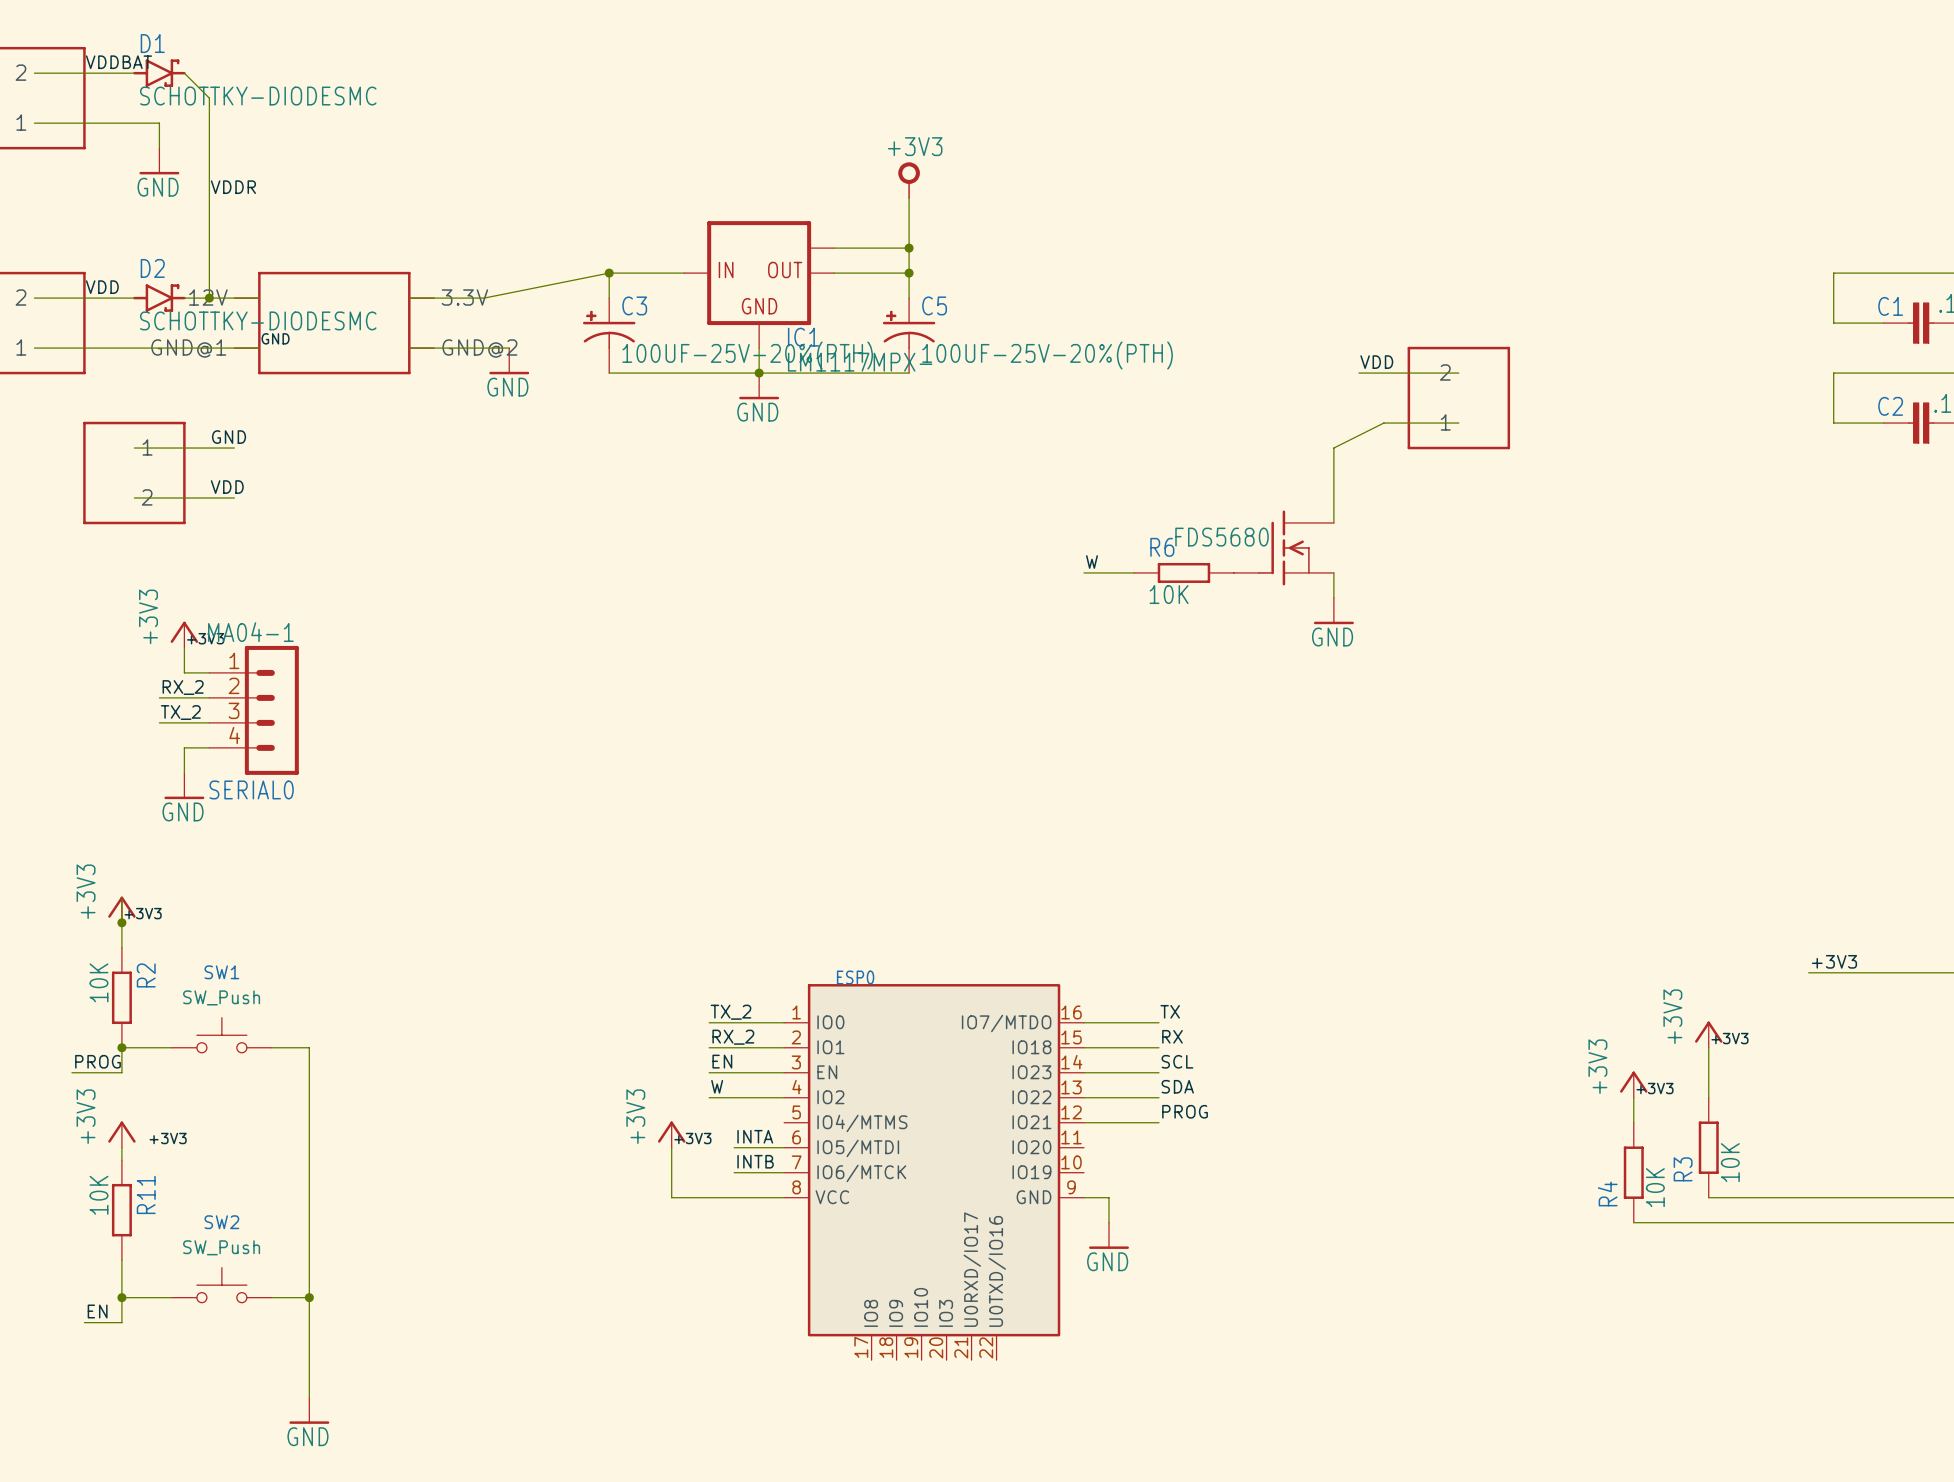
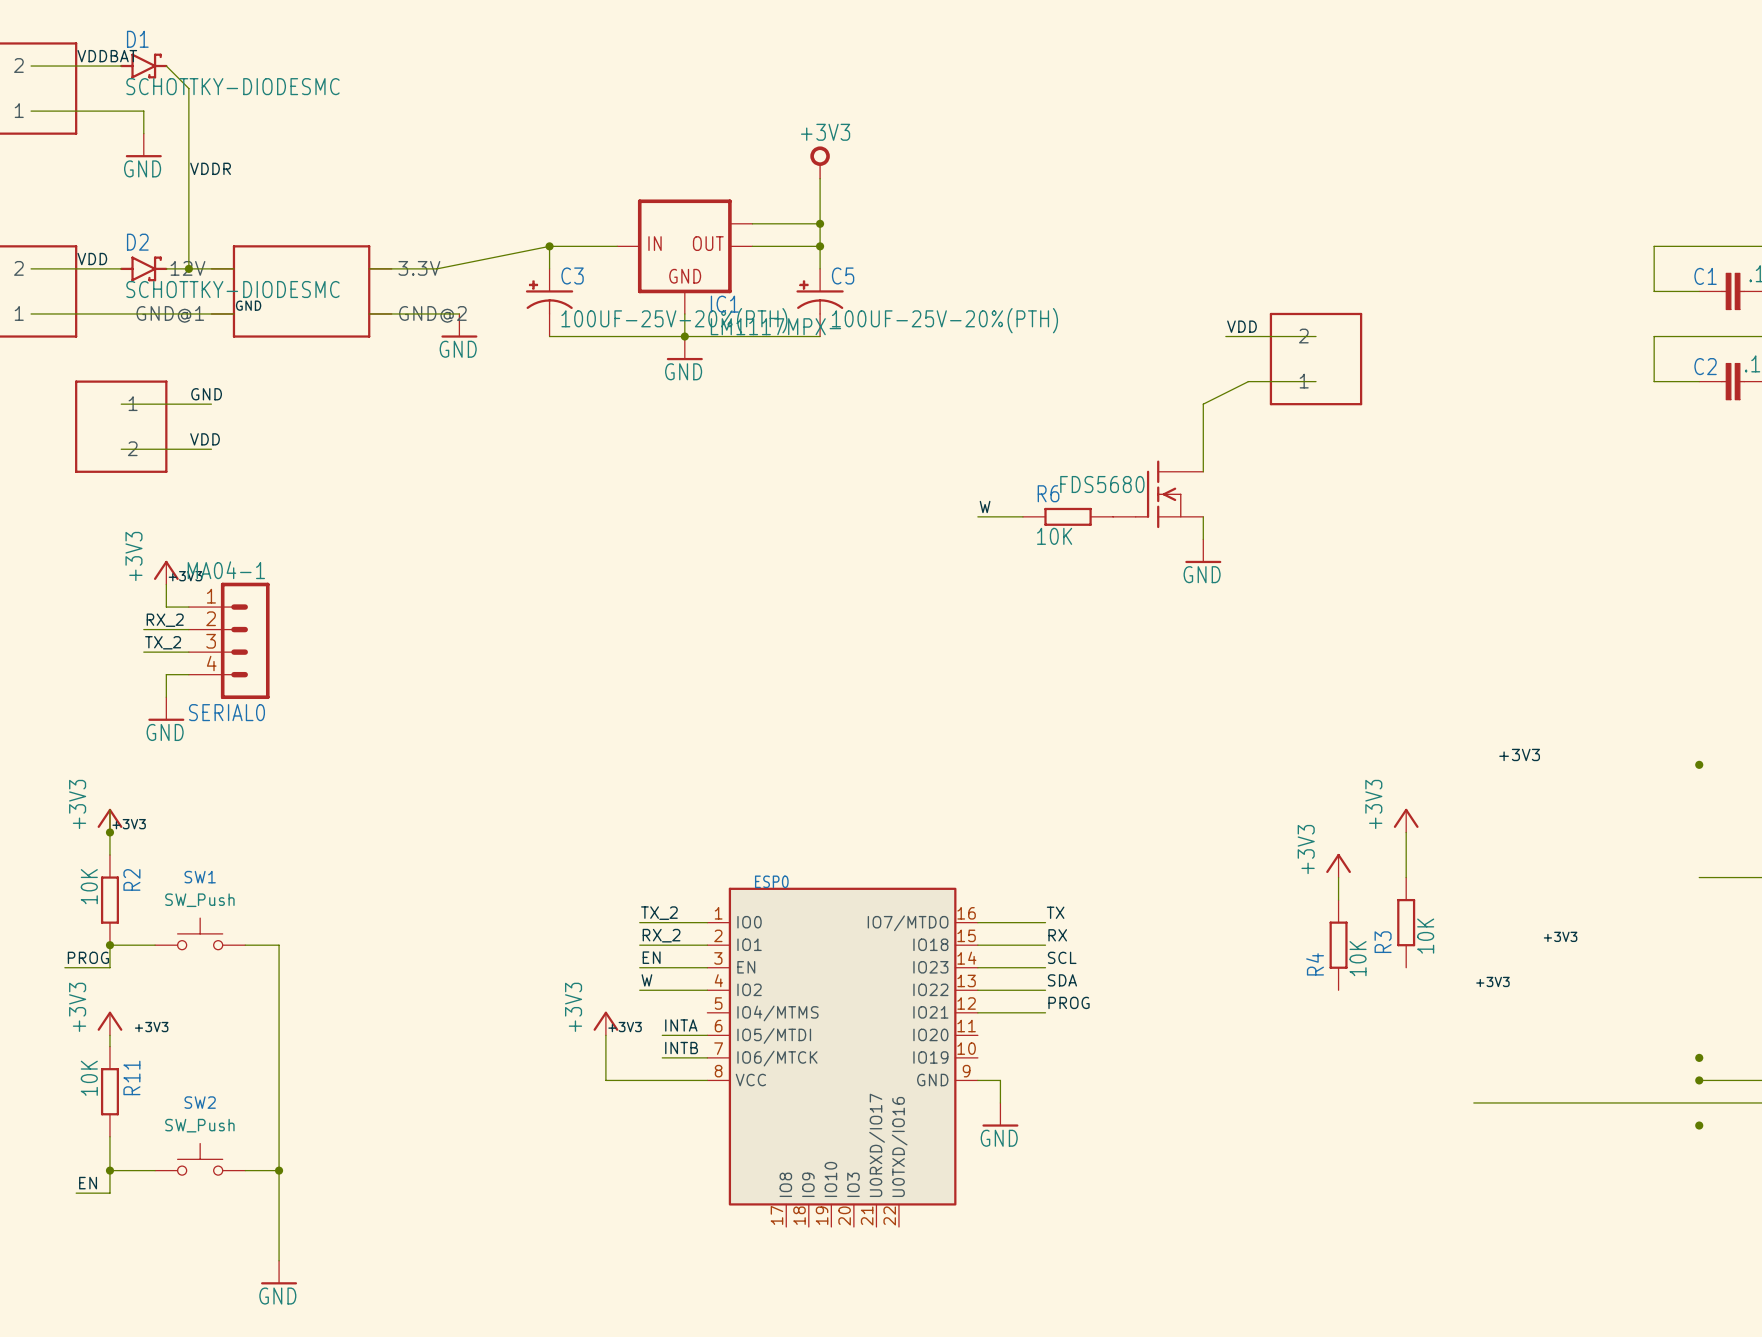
junction: none -> (1699, 764)
power symbol: none -> +3V3 (1406, 820)
power symbol: none -> +3V3 (1338, 865)
label position: +3V3 (1834, 961) -> +3V3 (1519, 754)
wire: (1808, 972) (1883, 972) -> none
power symbol: +3V3 (1708, 1034) -> none
wire: (1708, 1047) (1708, 1097) -> (1406, 832) (1406, 877)
power symbol: +3V3 (1633, 1084) -> none
wire: (1633, 1097) (1633, 1122) -> (1338, 877) (1338, 900)
R3 position: (1708, 1147) -> (1406, 922)
R4 position: (1633, 1172) -> (1338, 945)
junction: none -> (1699, 1057)
wire: (1708, 1197) (1883, 1197) -> none
junction: none -> (1699, 1080)
junction: none -> (1699, 1125)

